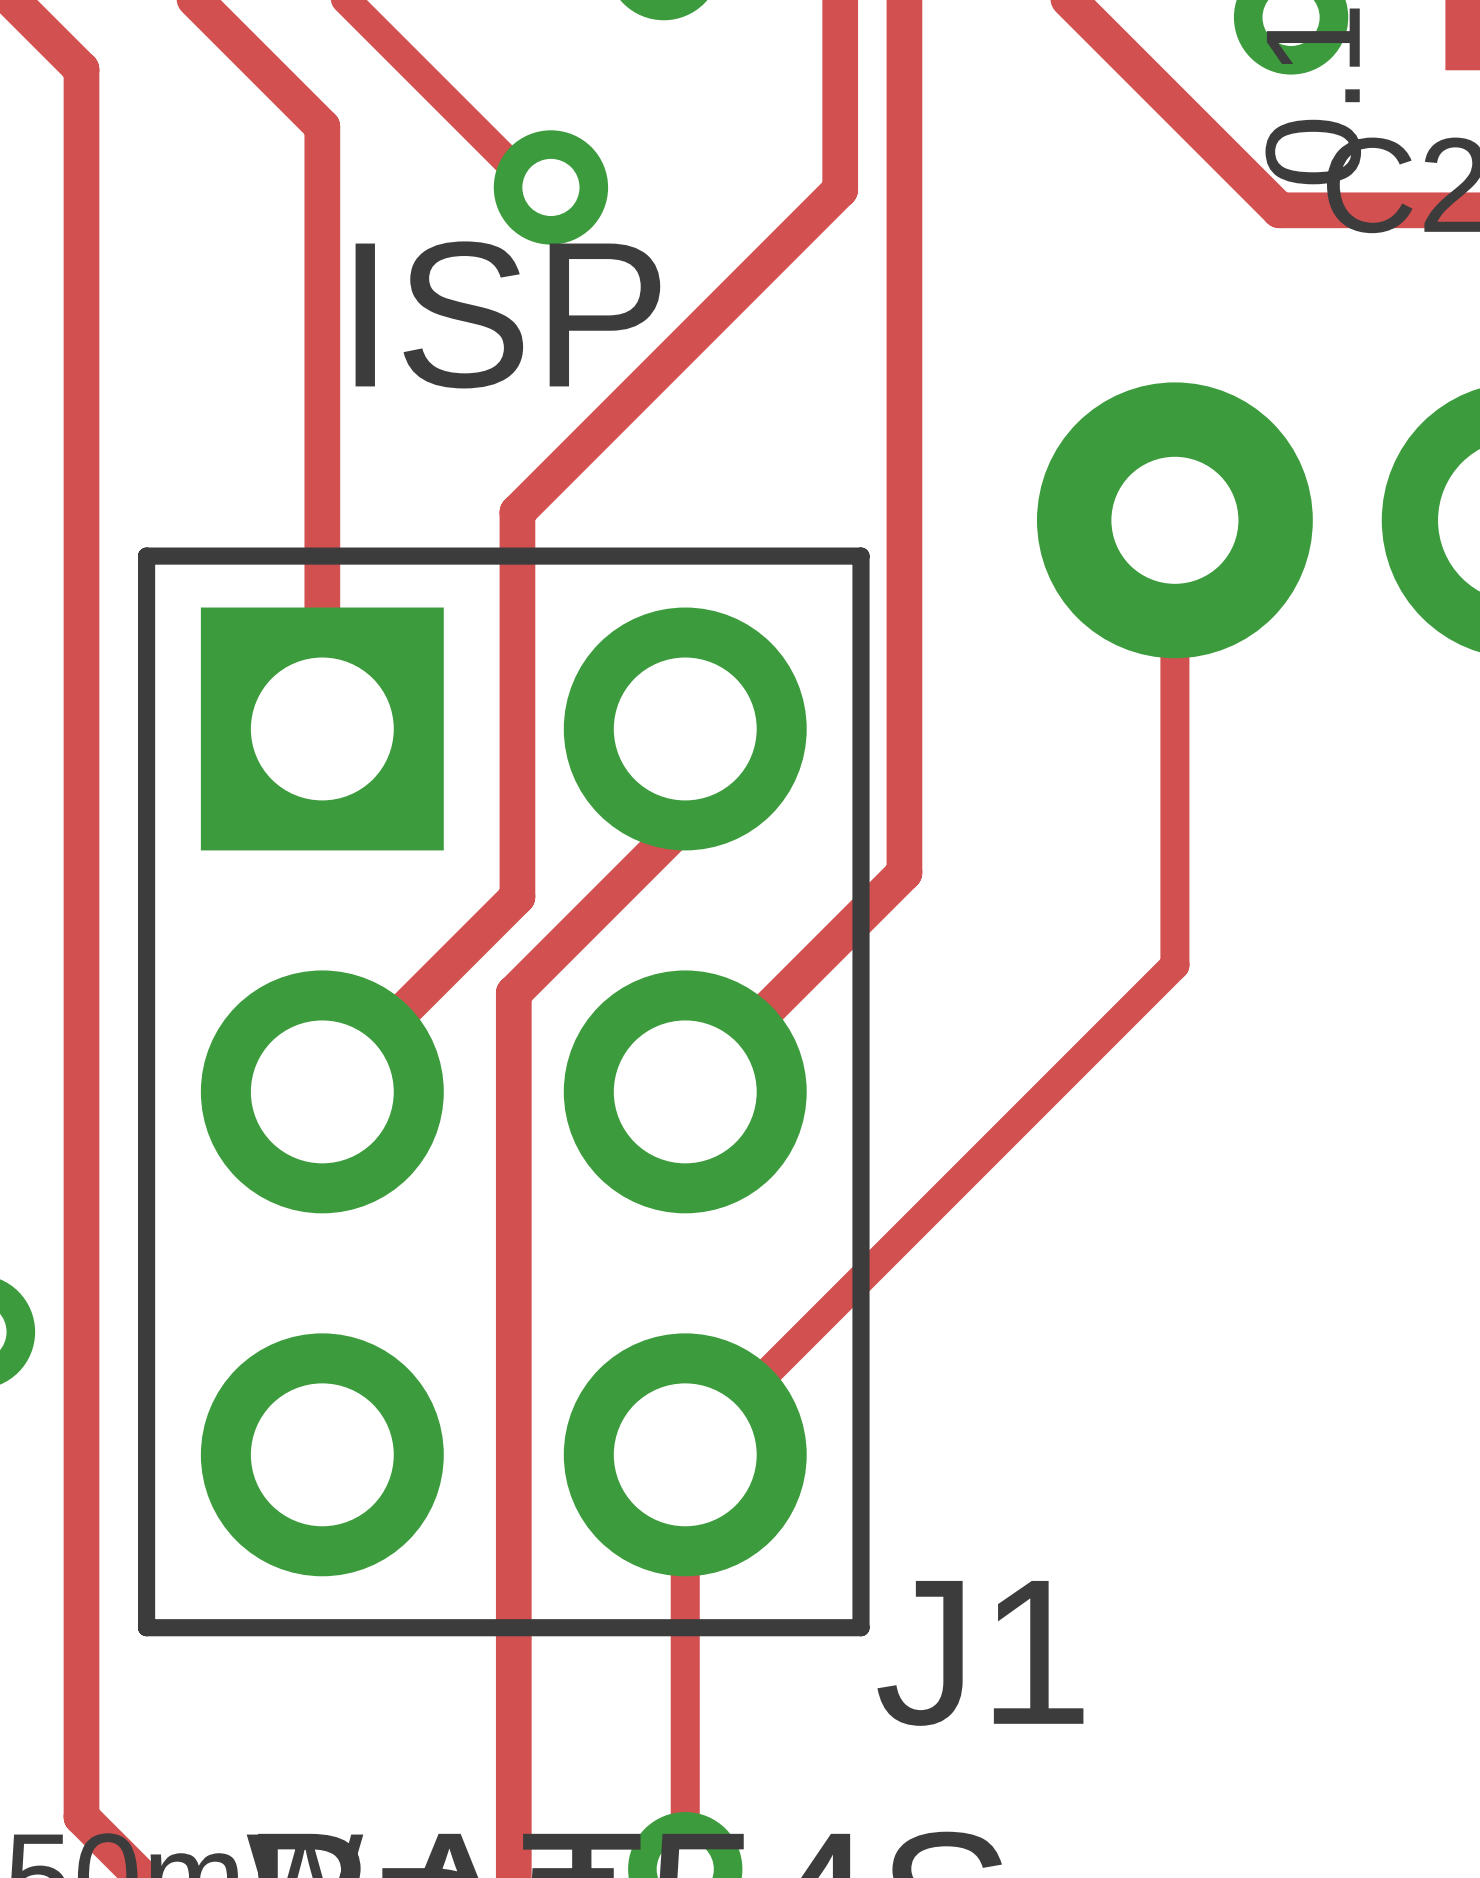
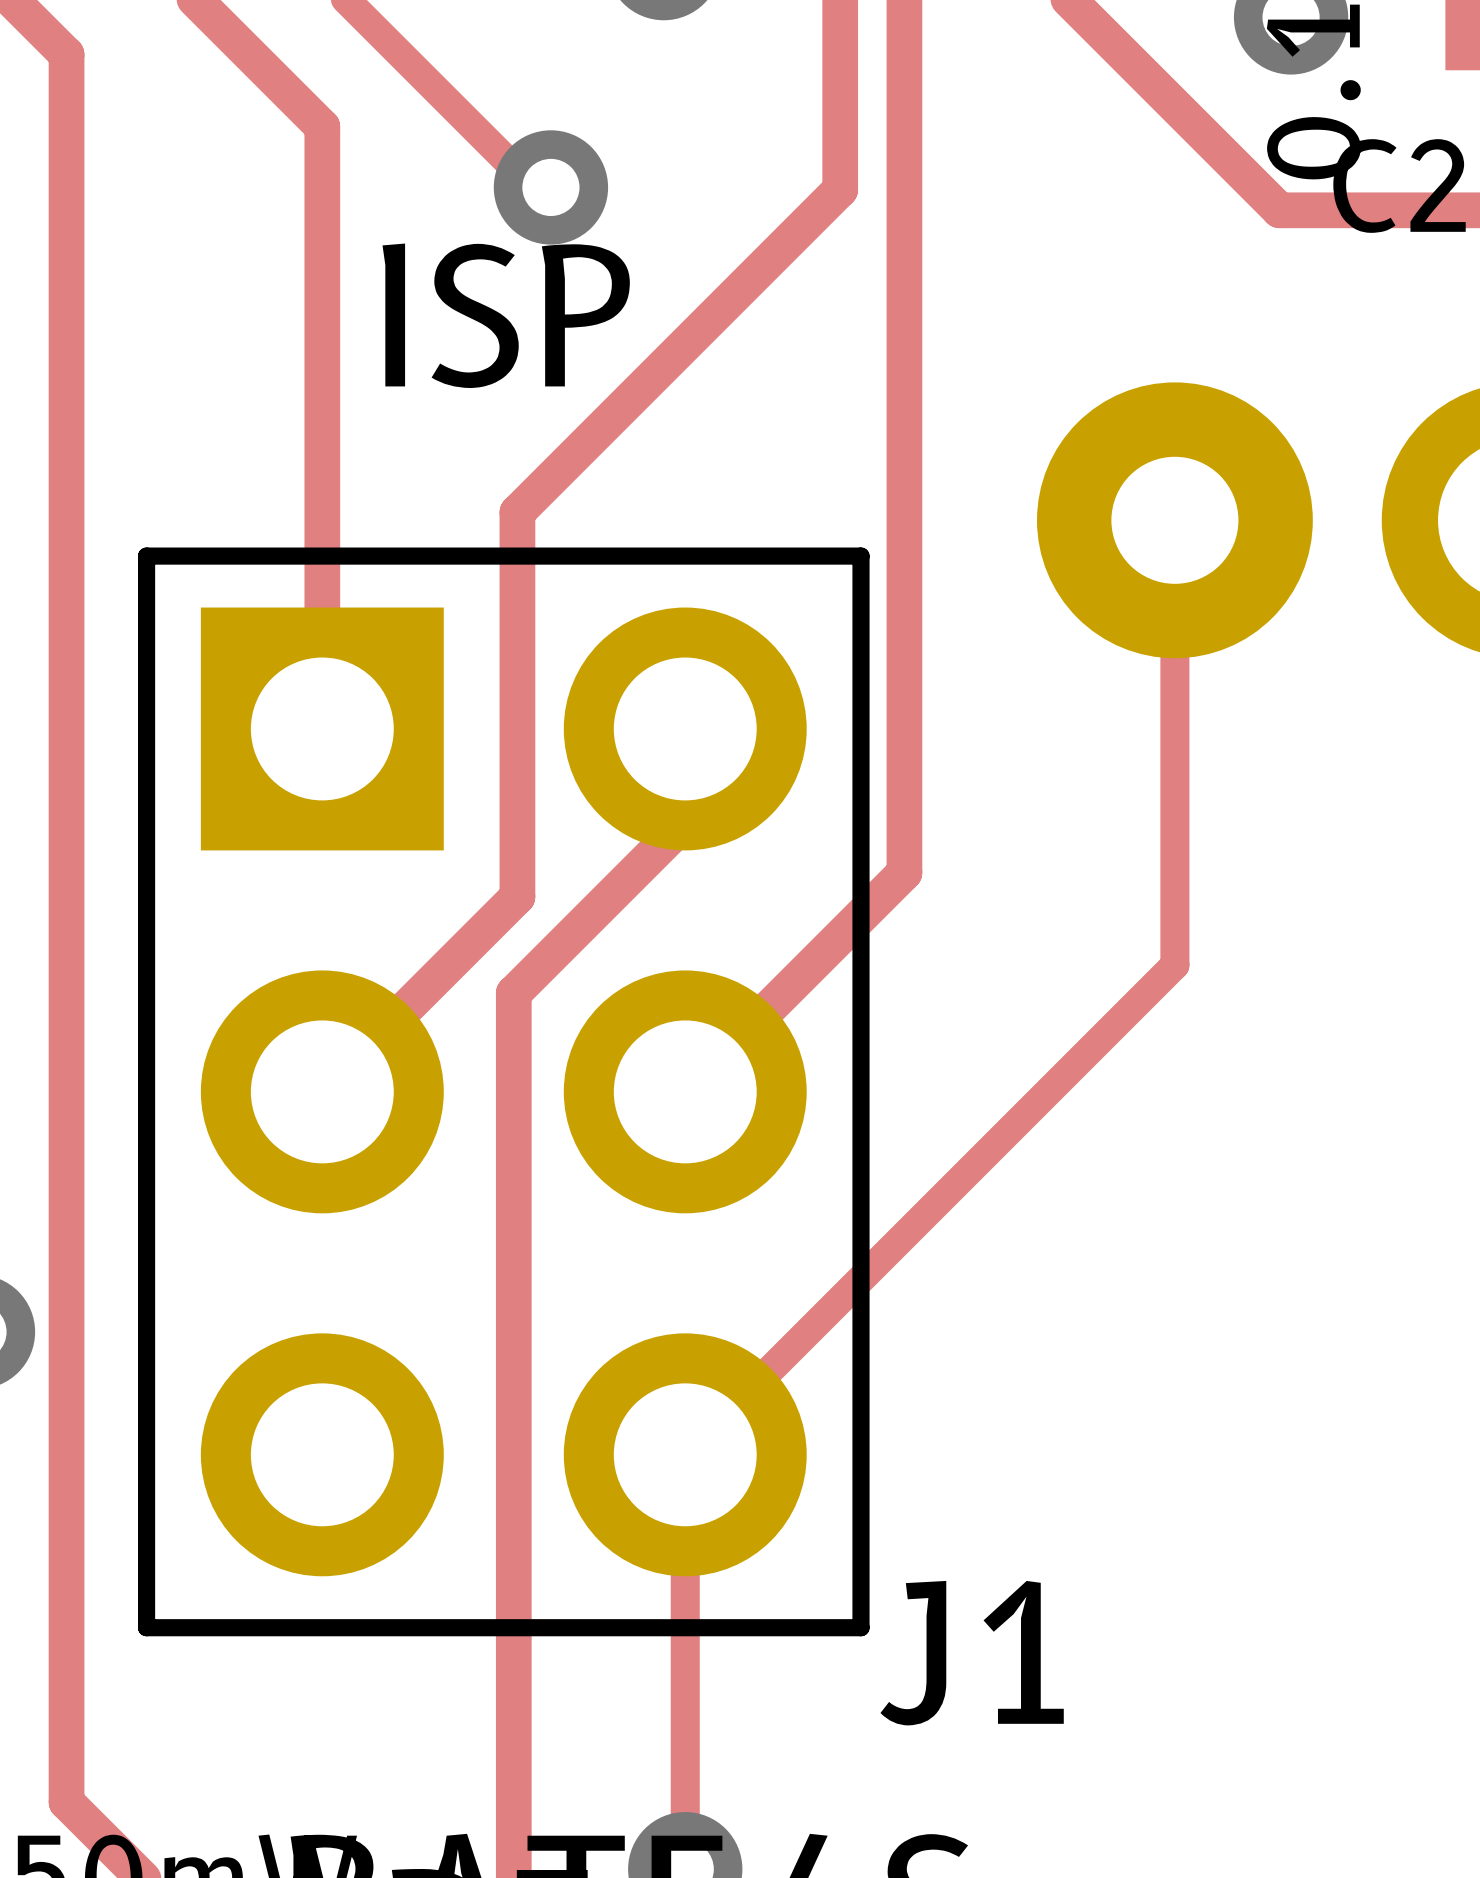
track: (66, 54) (81, 69) (81, 1816) -> (66, 54) (66, 1802) (81, 1816)

